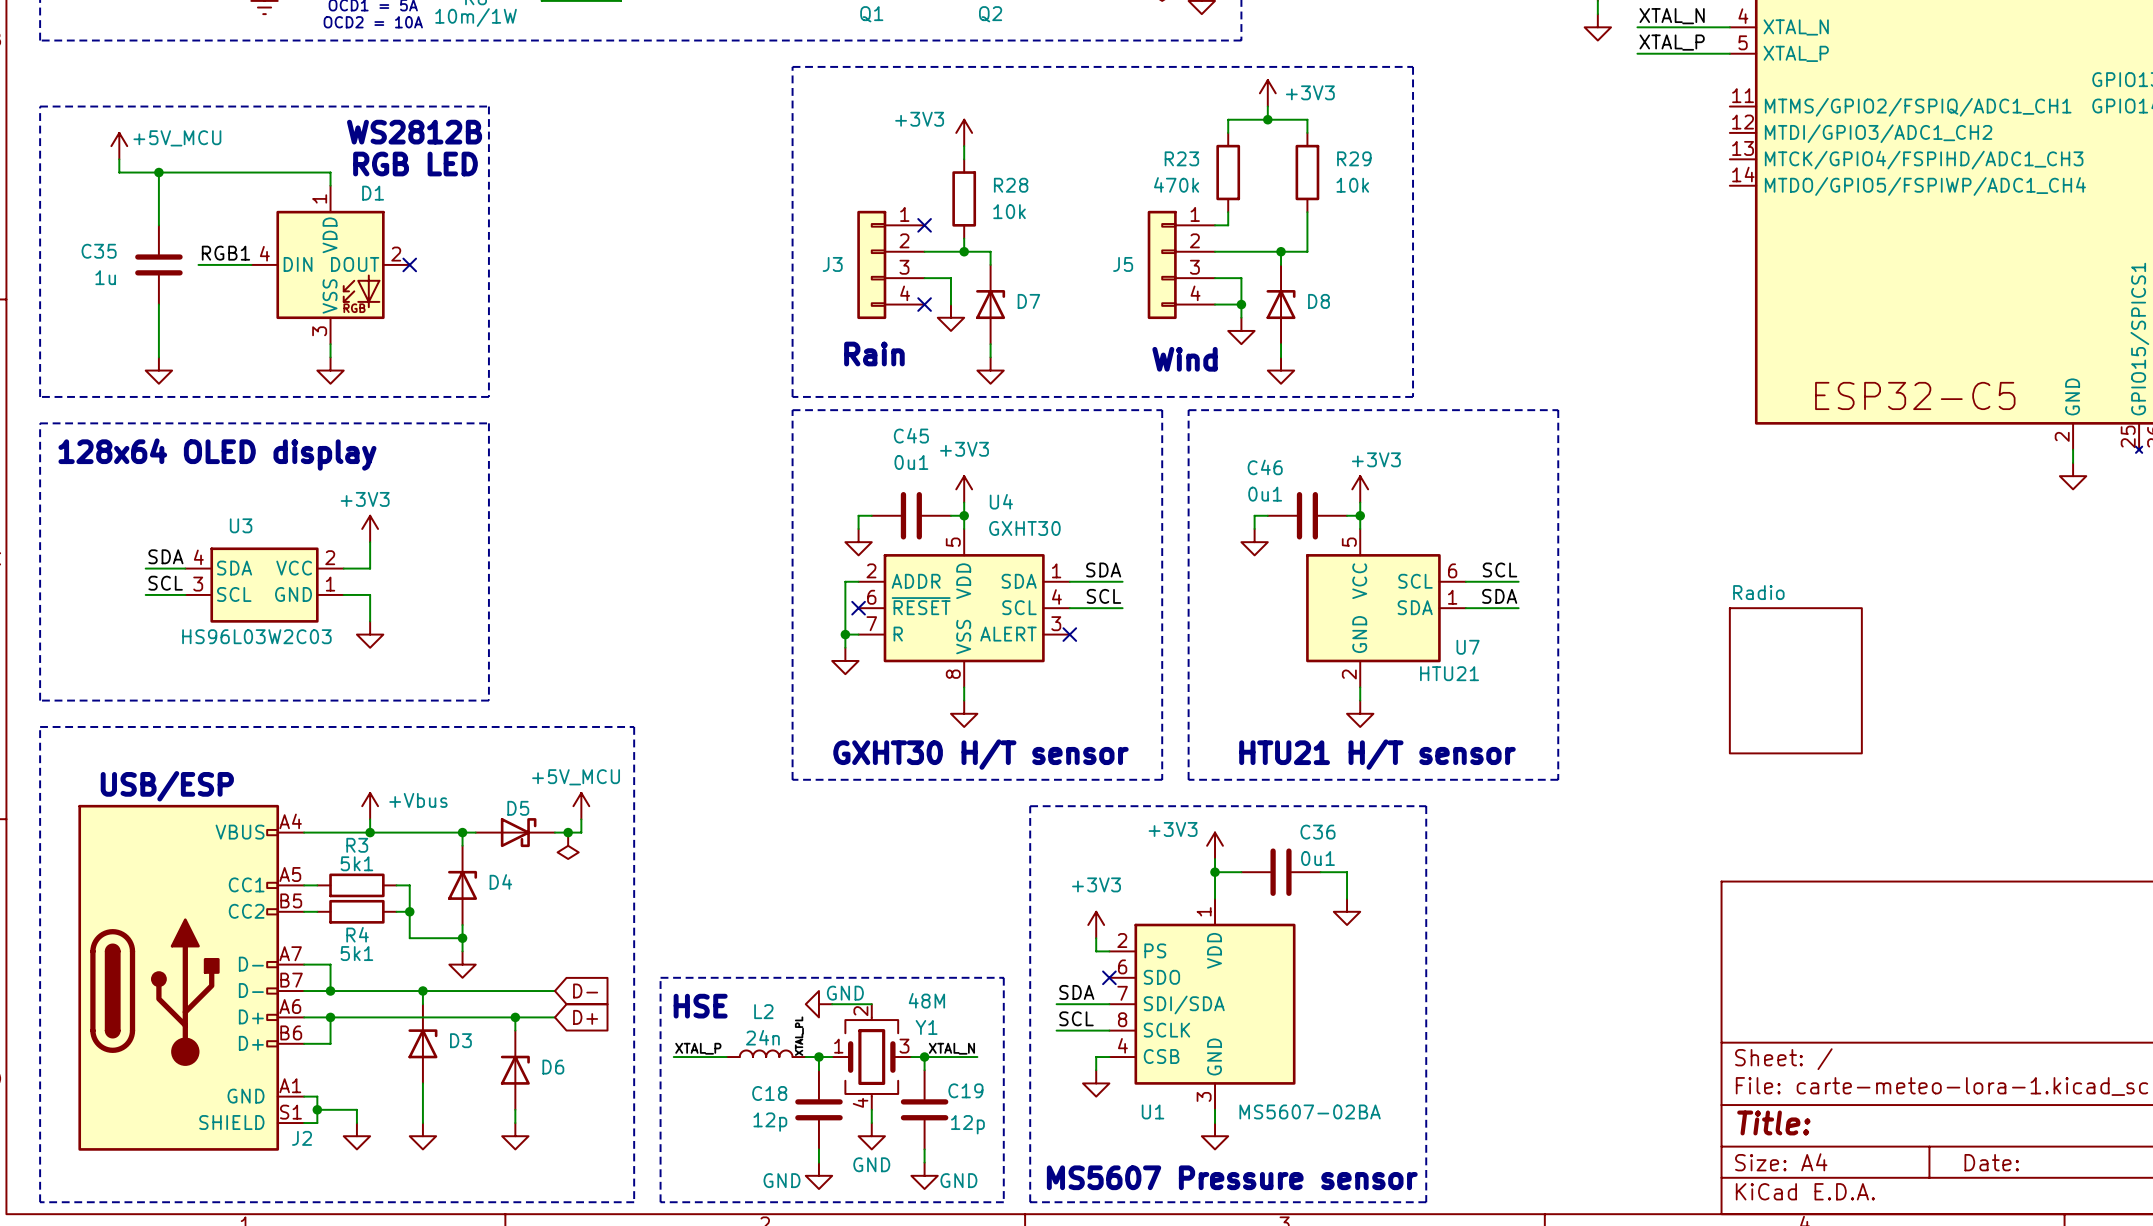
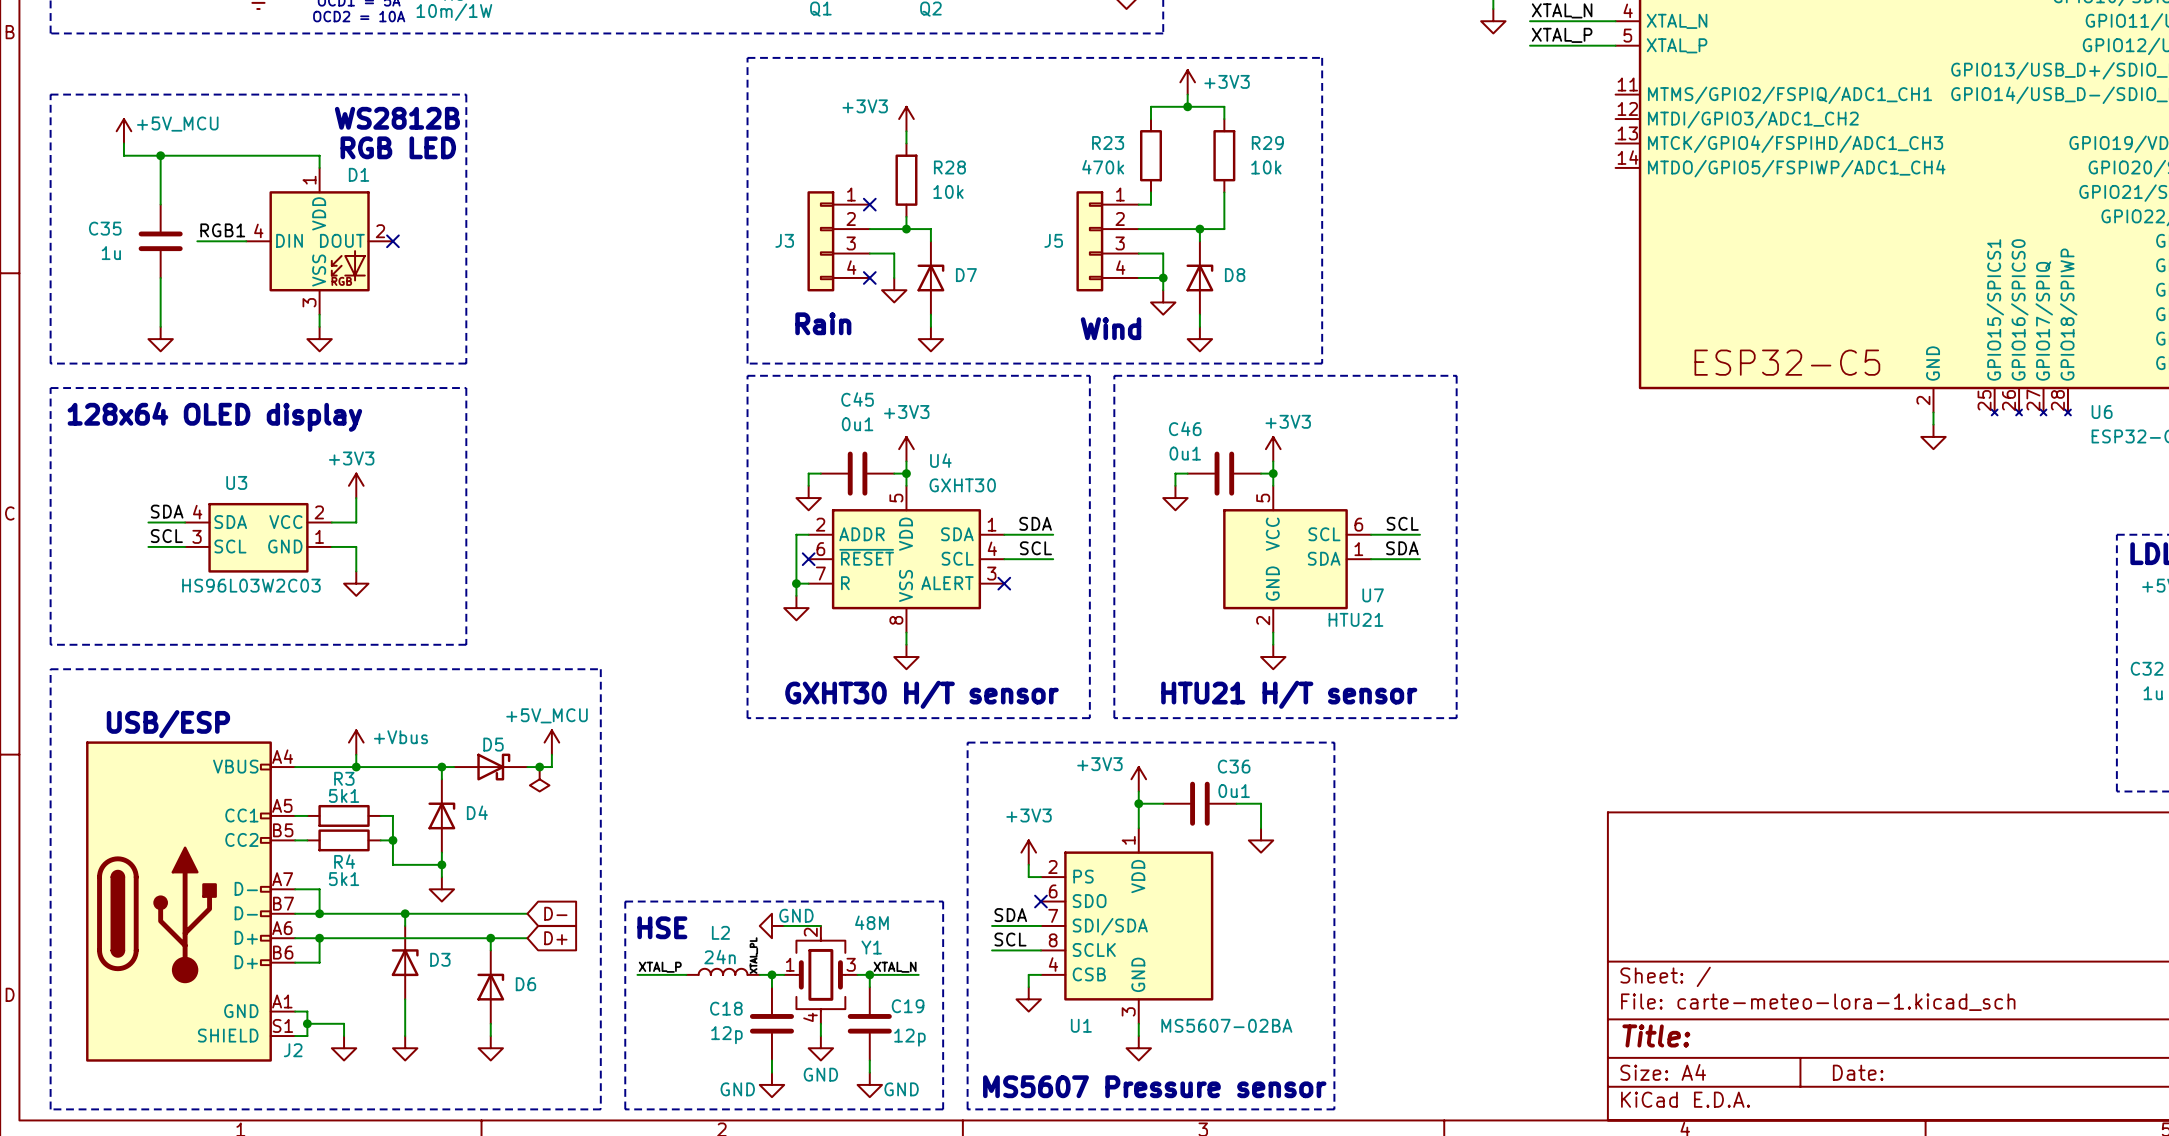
sheet Radio: (1795, 680) -> none

